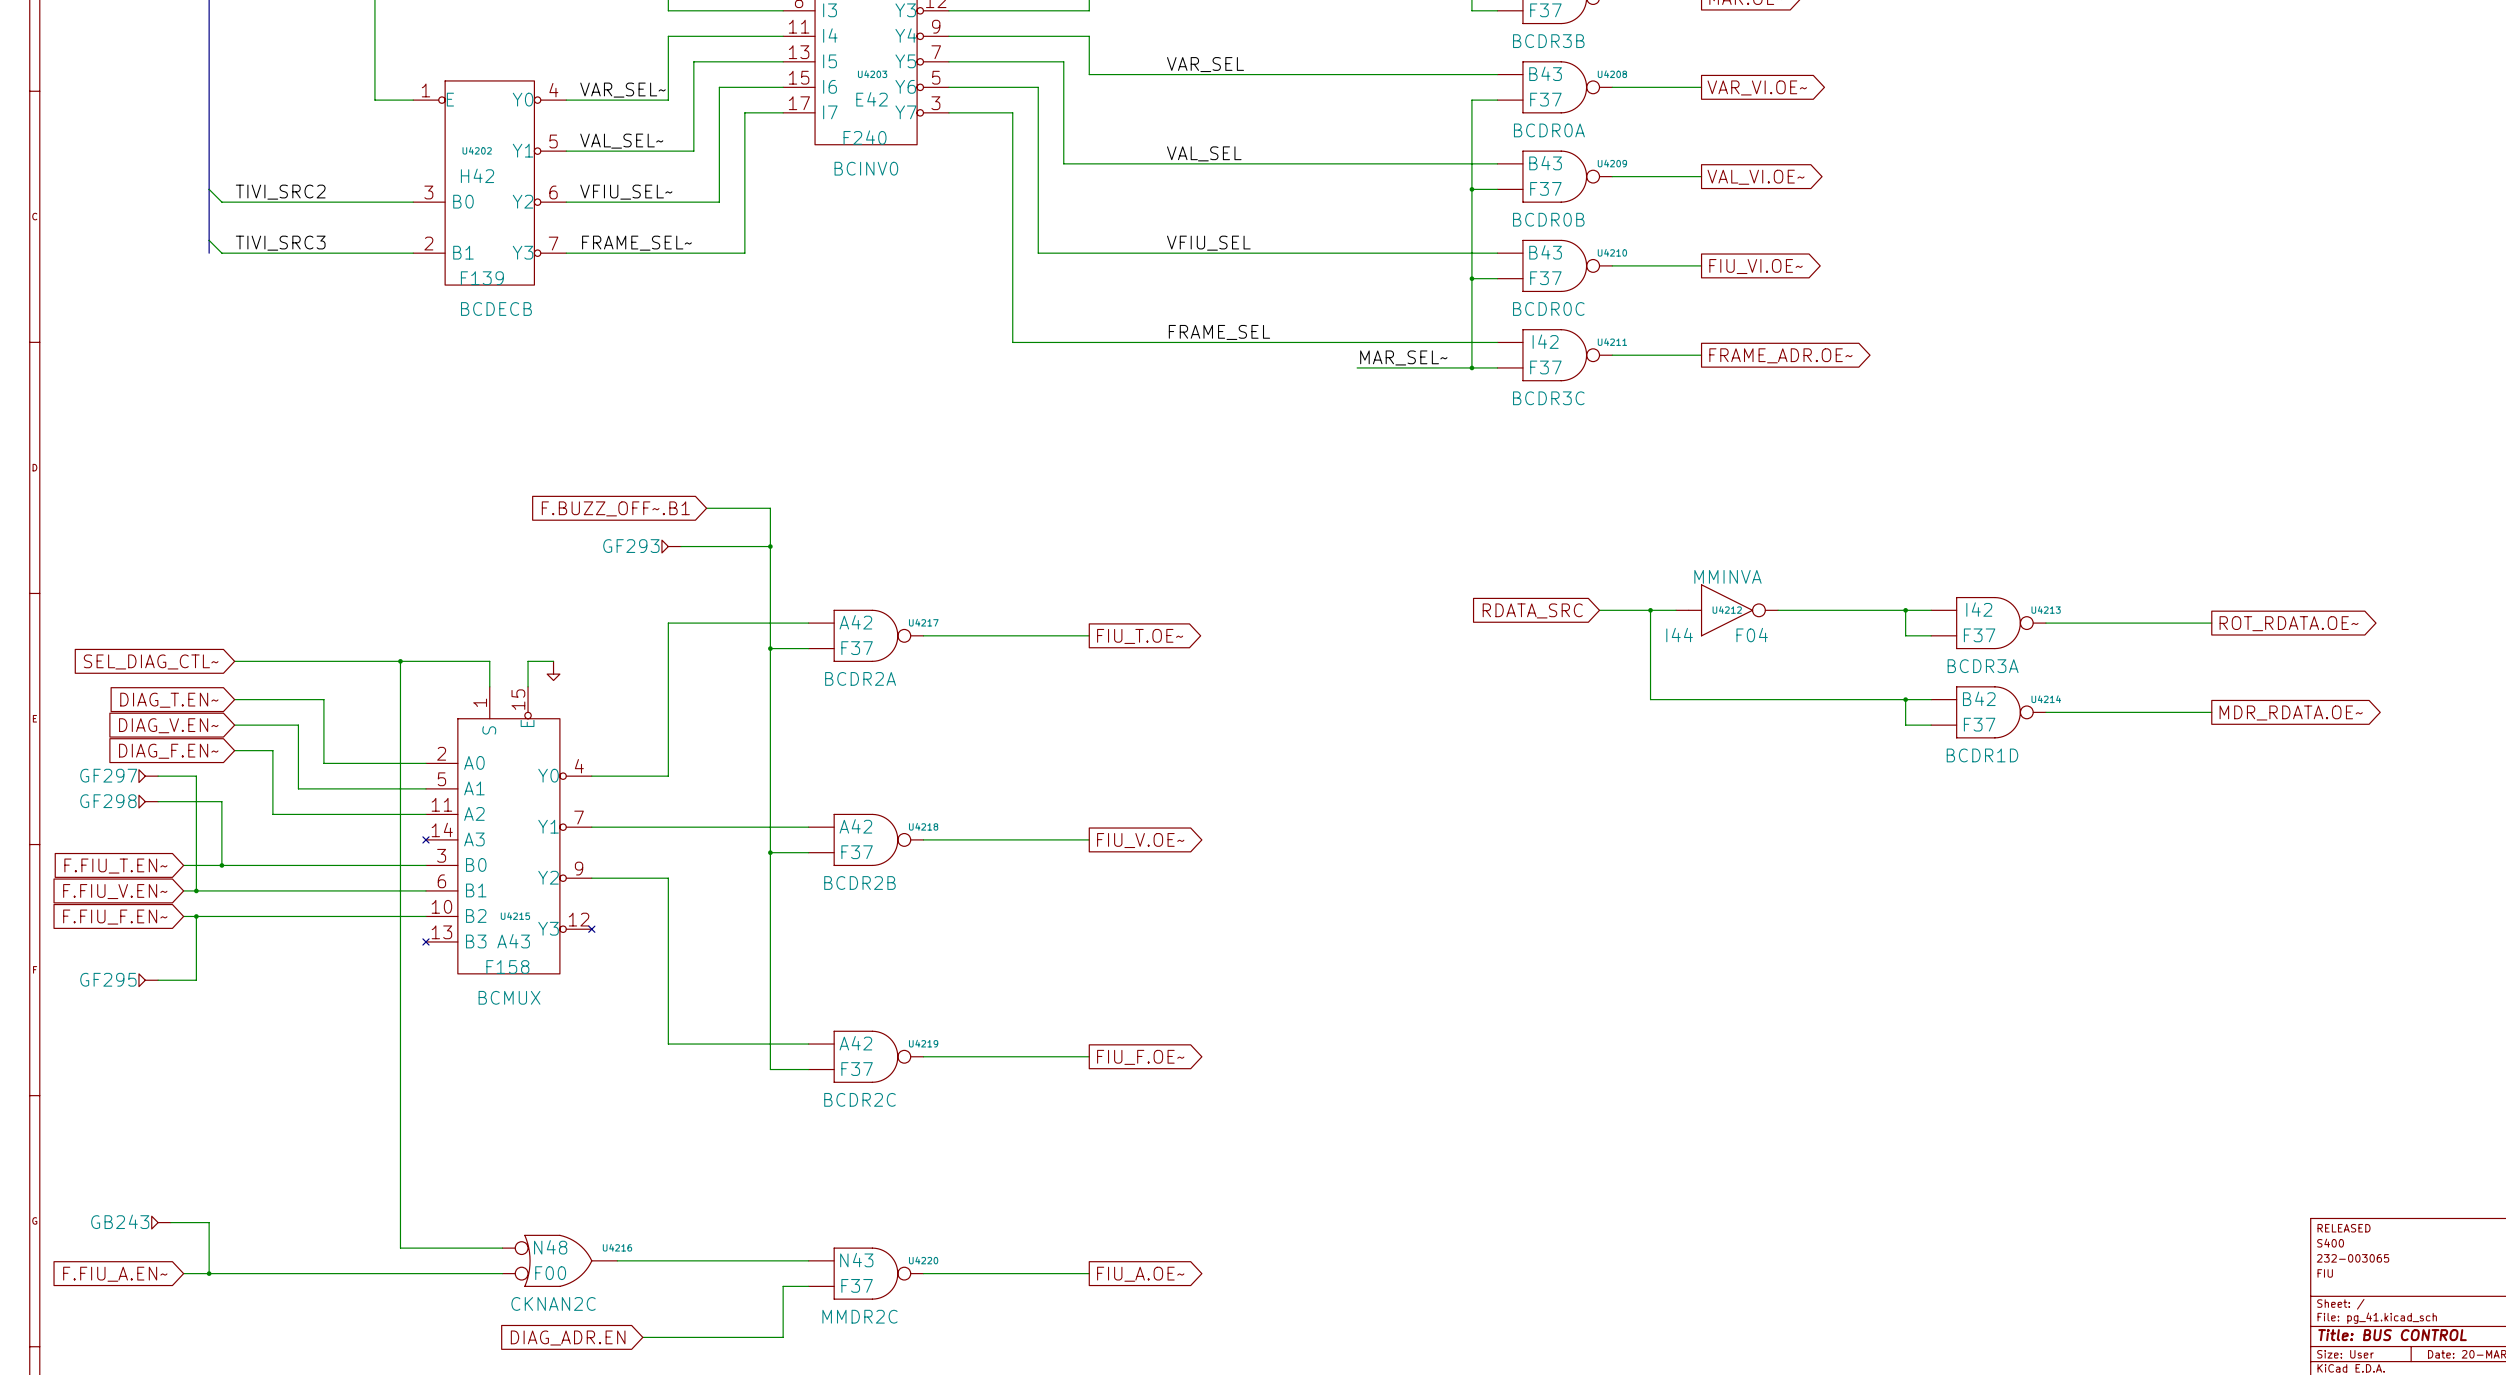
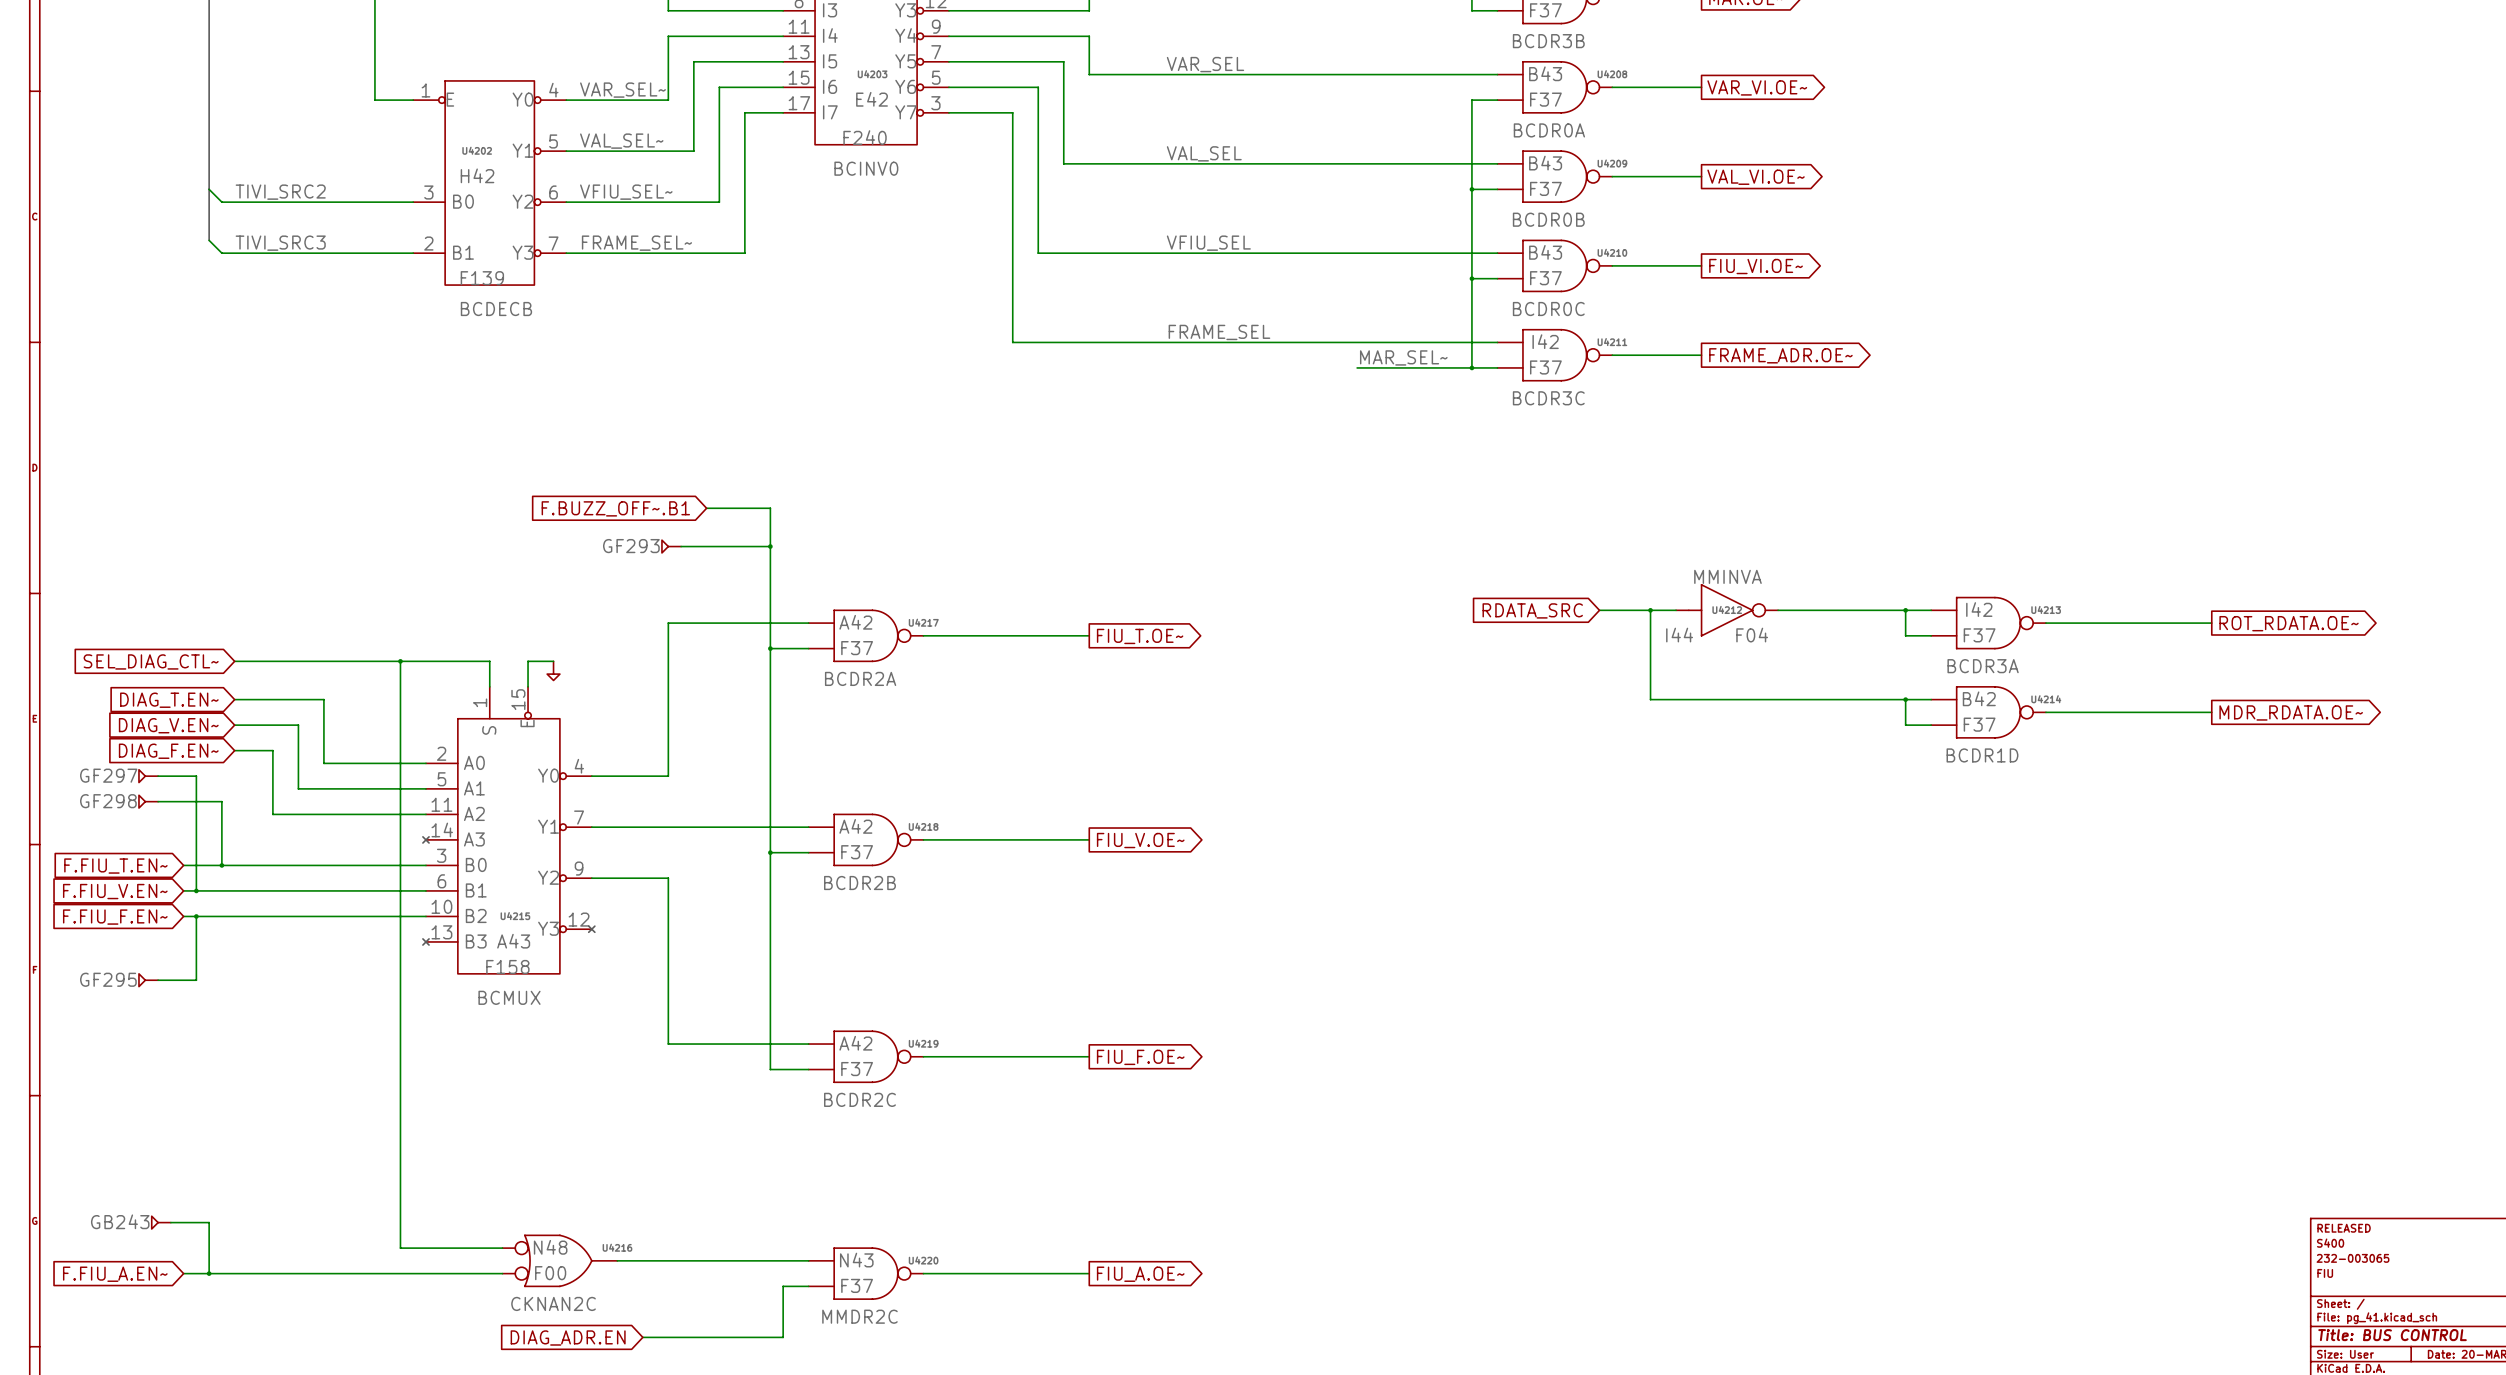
bus: (209, 240) (209, 253) -> none

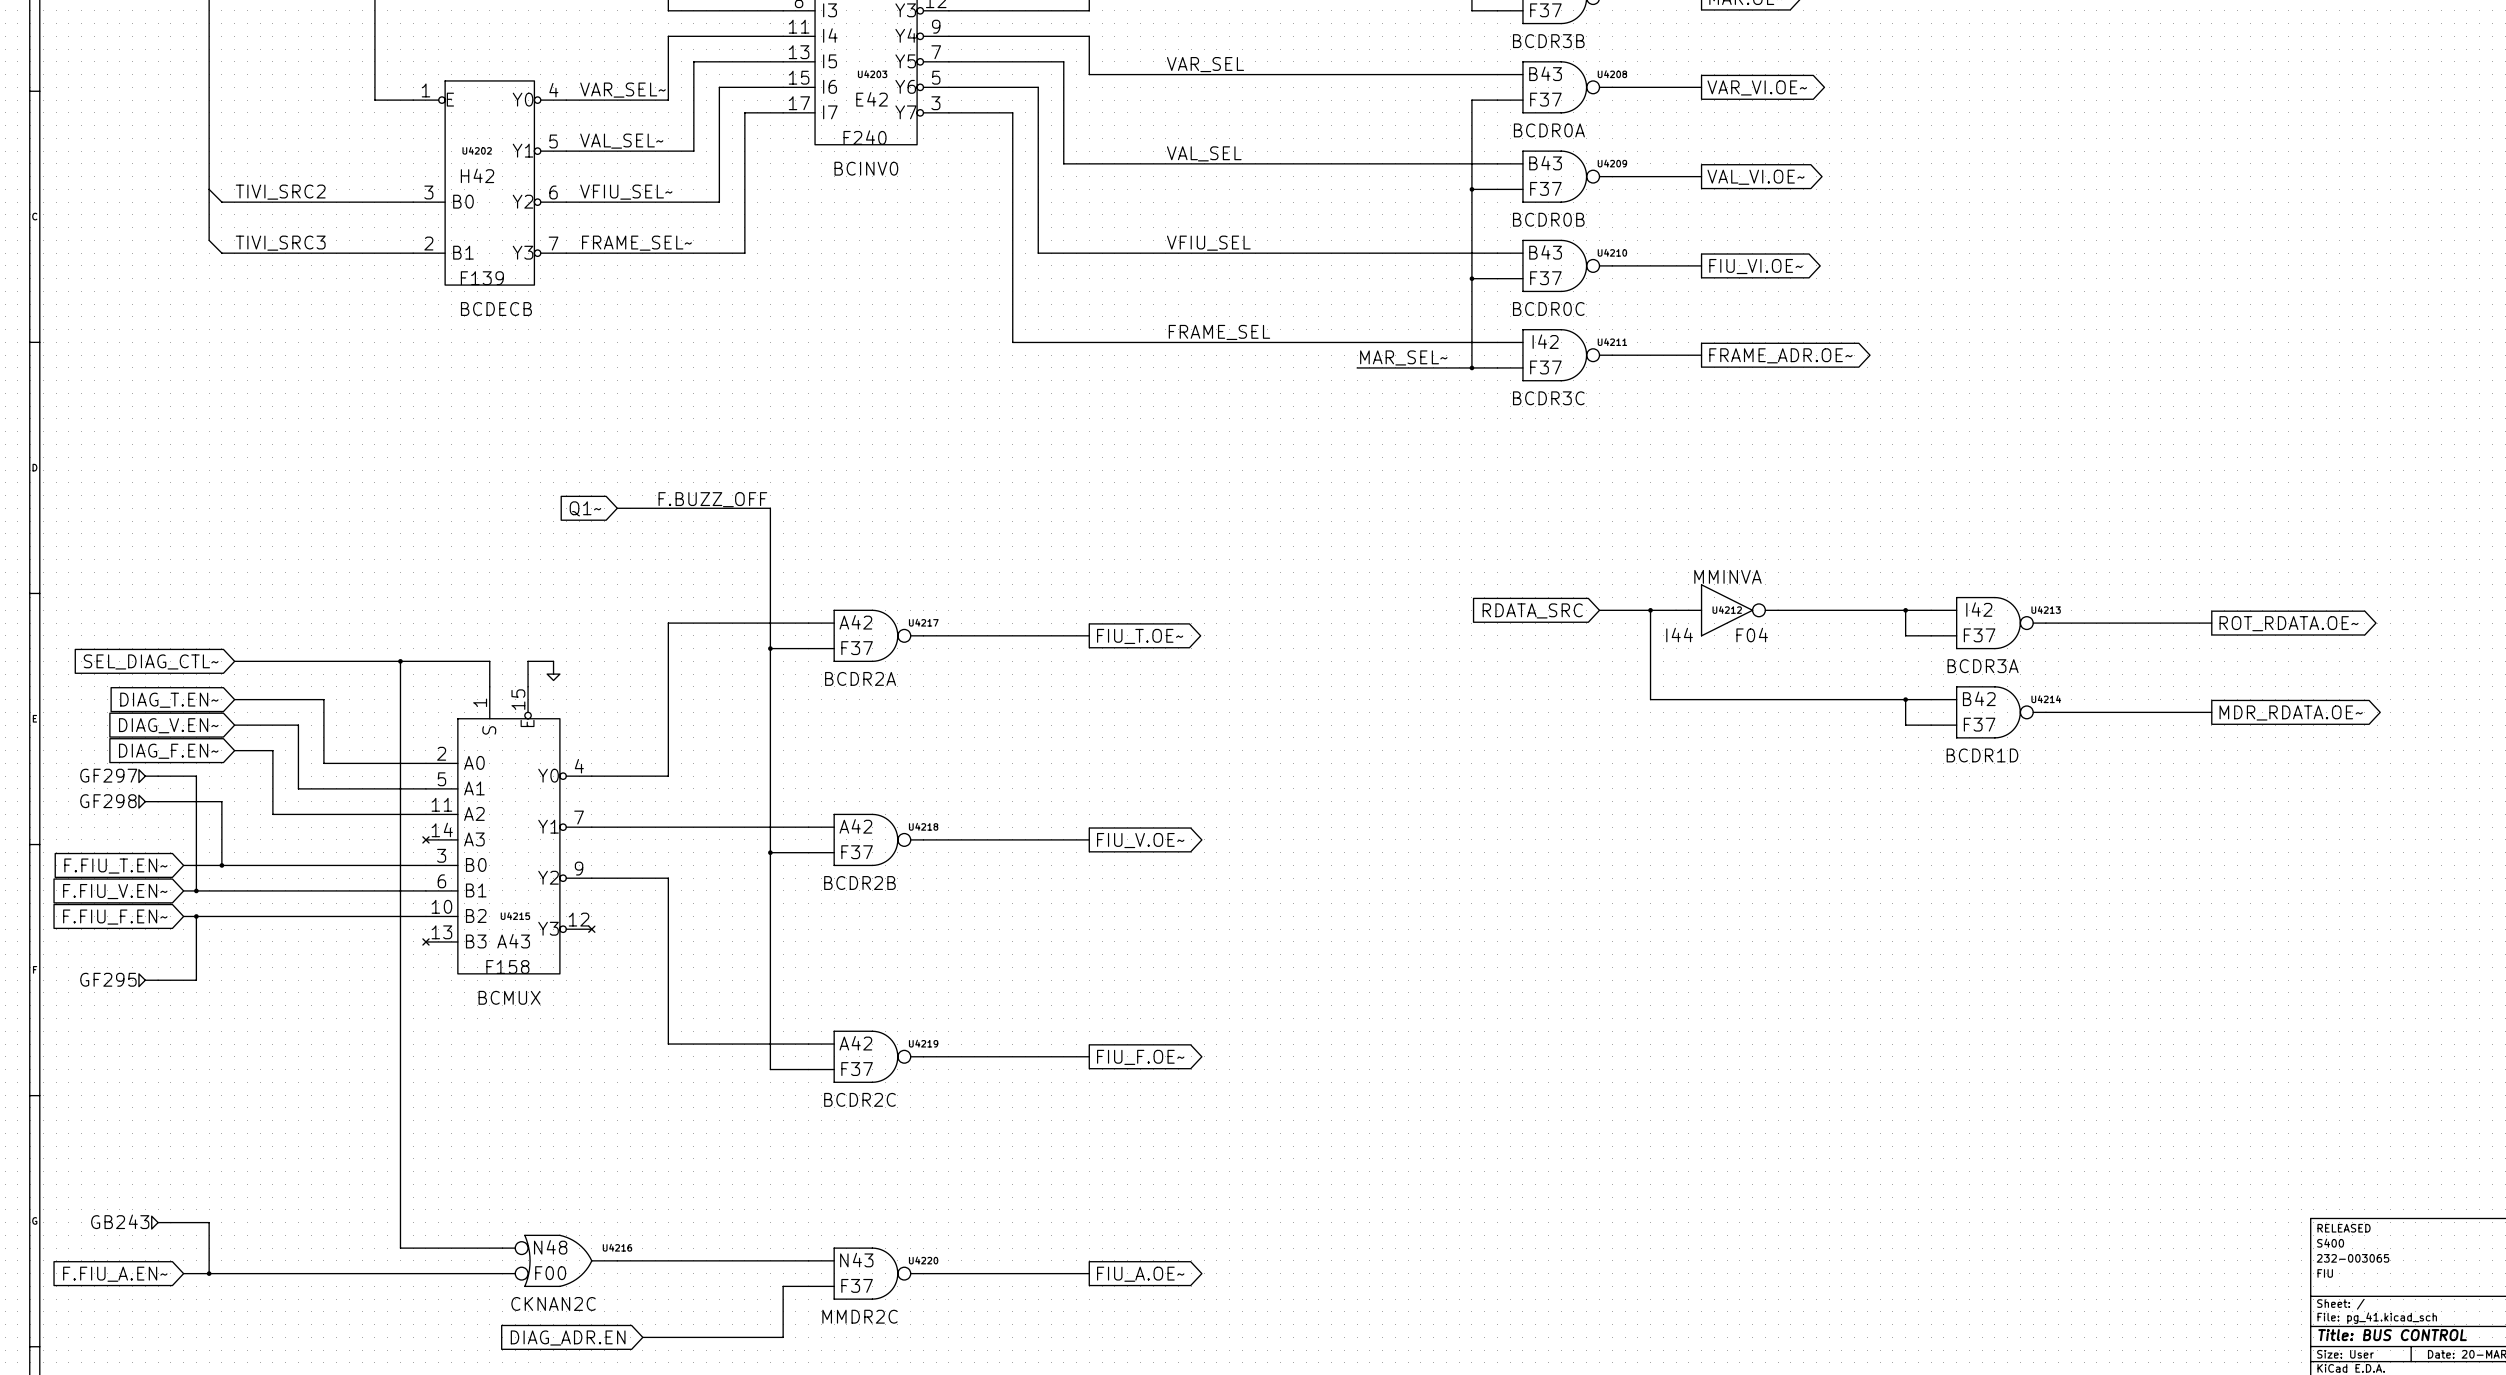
text: none -> F.BUZZ_OFF (712, 499)
global label: none -> Q1~ (585, 508)
global label: F.BUZZ_OFF~.B1 (615, 508) -> none
GF293: (671, 546) -> none
wire: (681, 546) (770, 546) -> (617, 508) (706, 508)
junction: (770, 546) -> none

